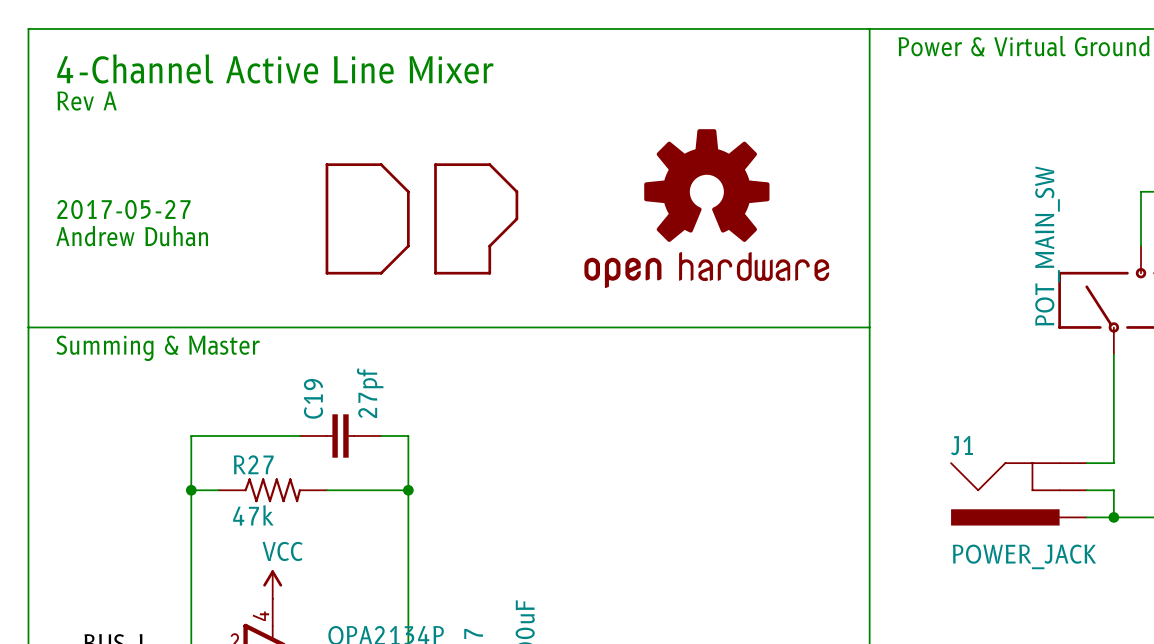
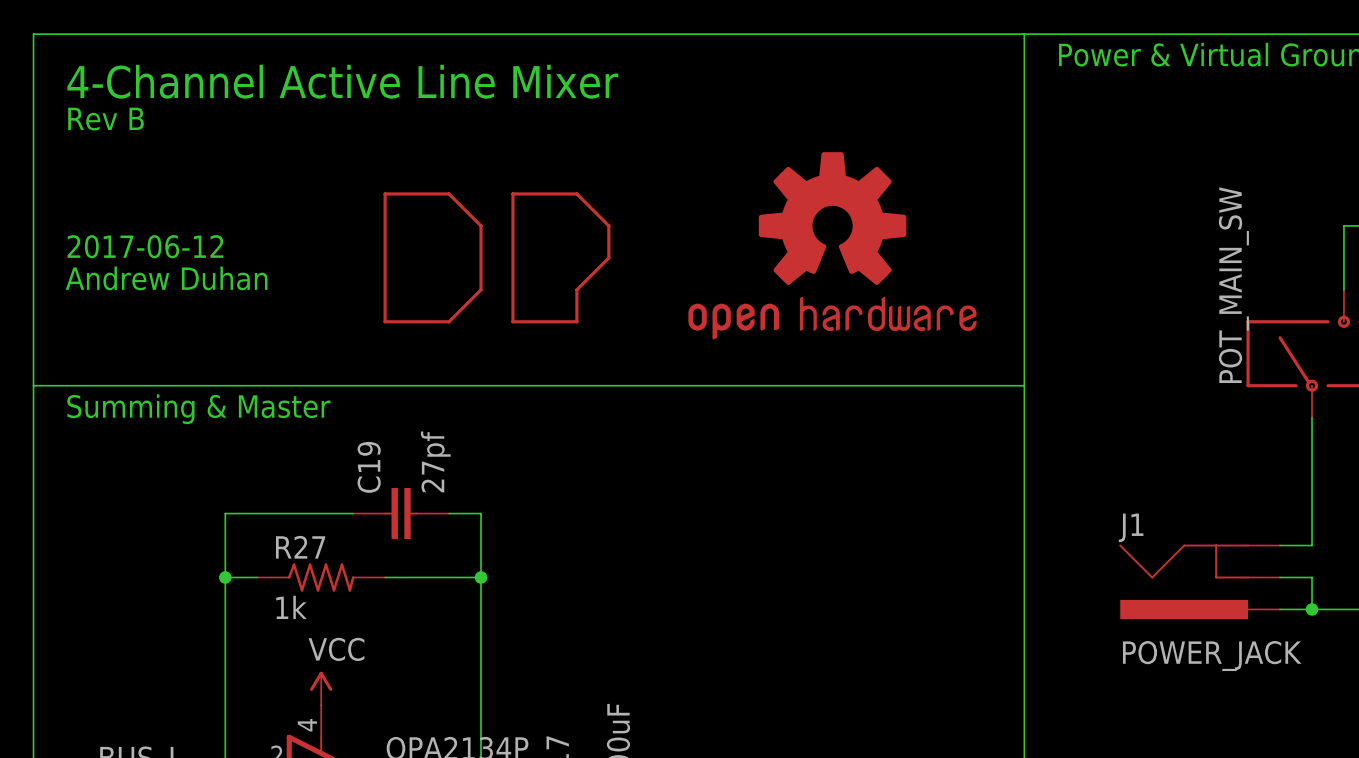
text: Rev A (87, 101) -> Rev B (106, 119)
text: 2017-05-27 (123, 209) -> 2017-06-12 (145, 246)
R27 value: 47k (253, 515) -> 1k (291, 607)

